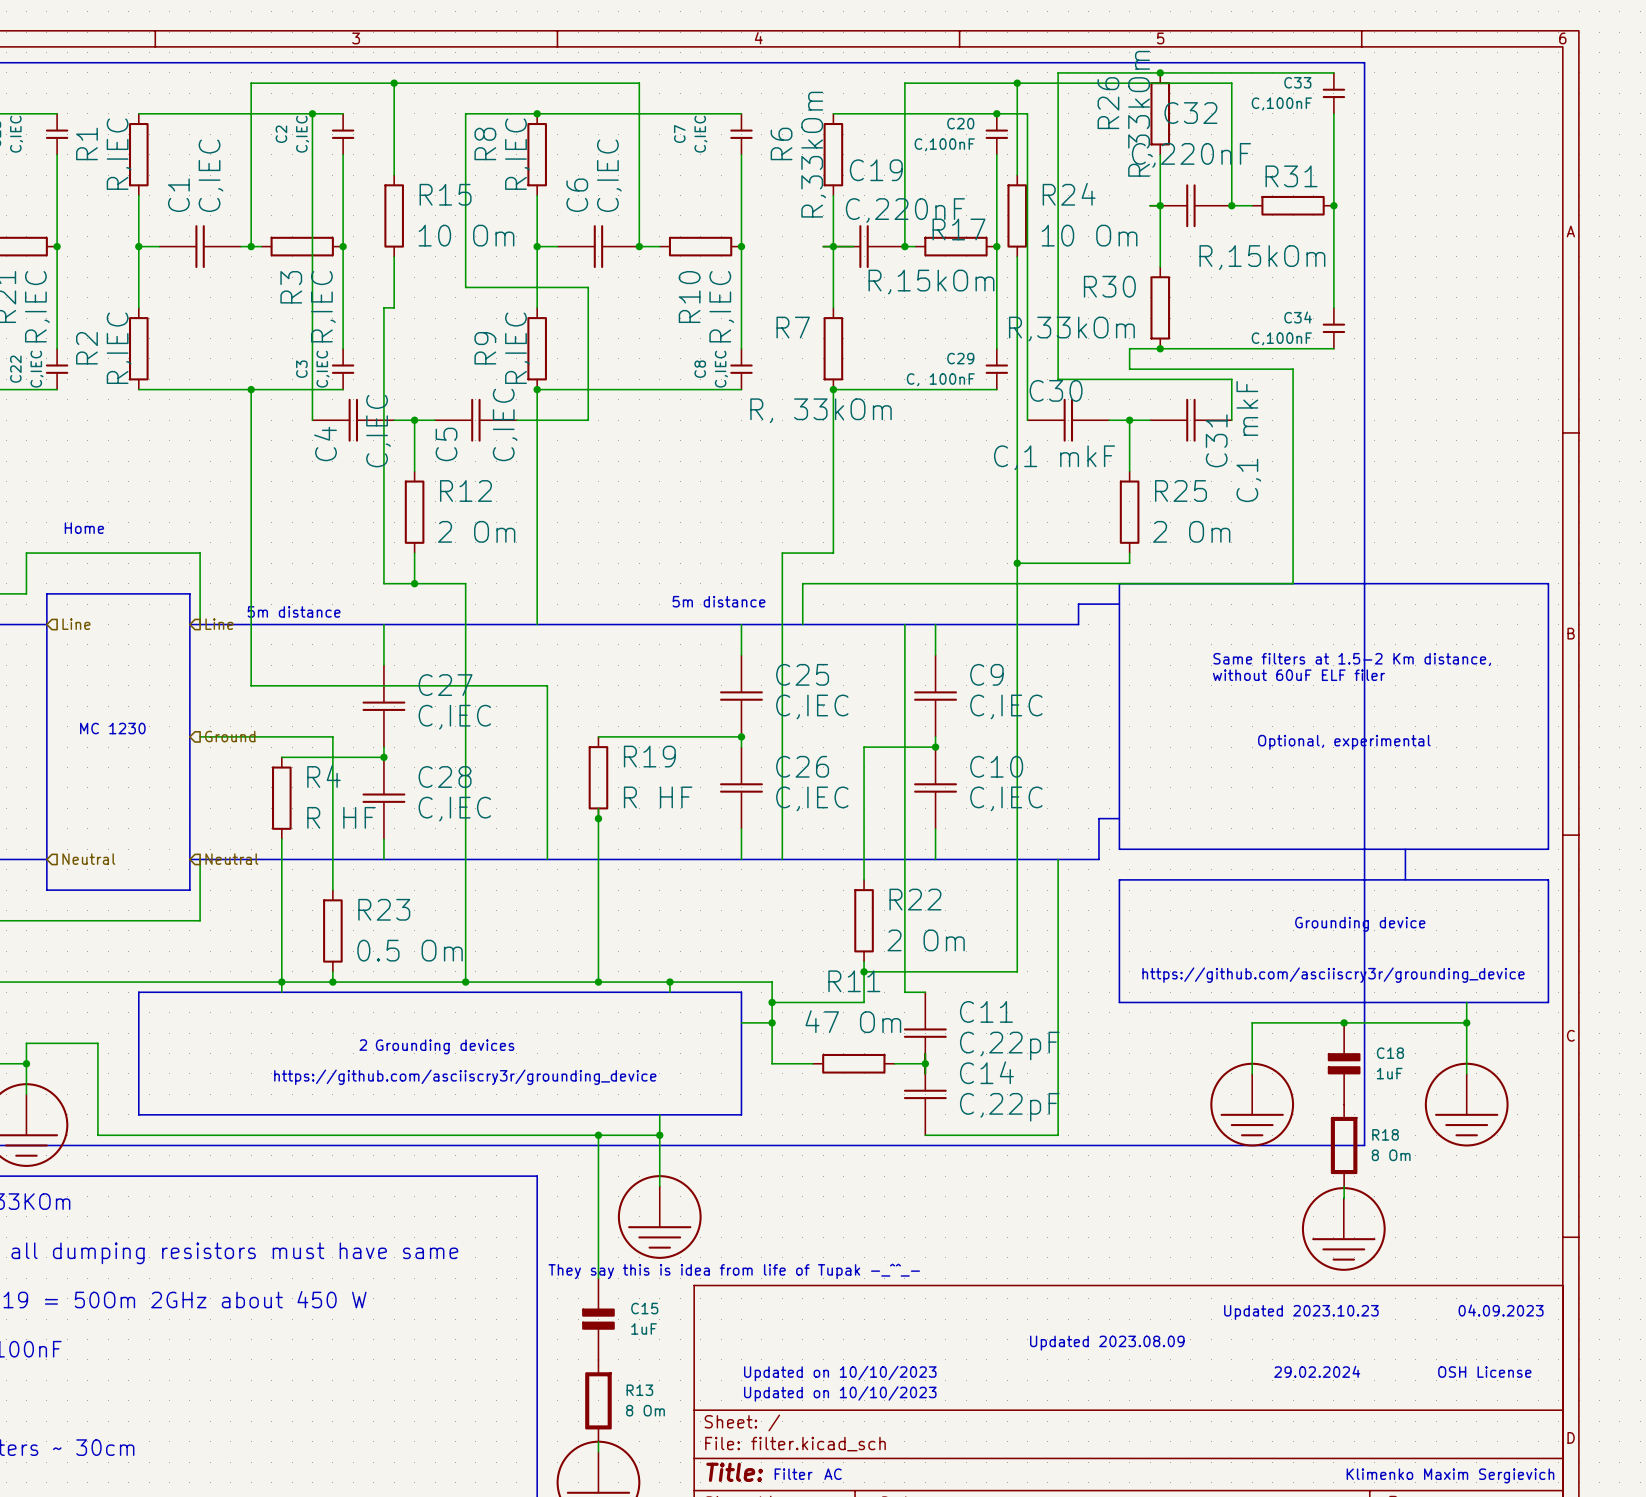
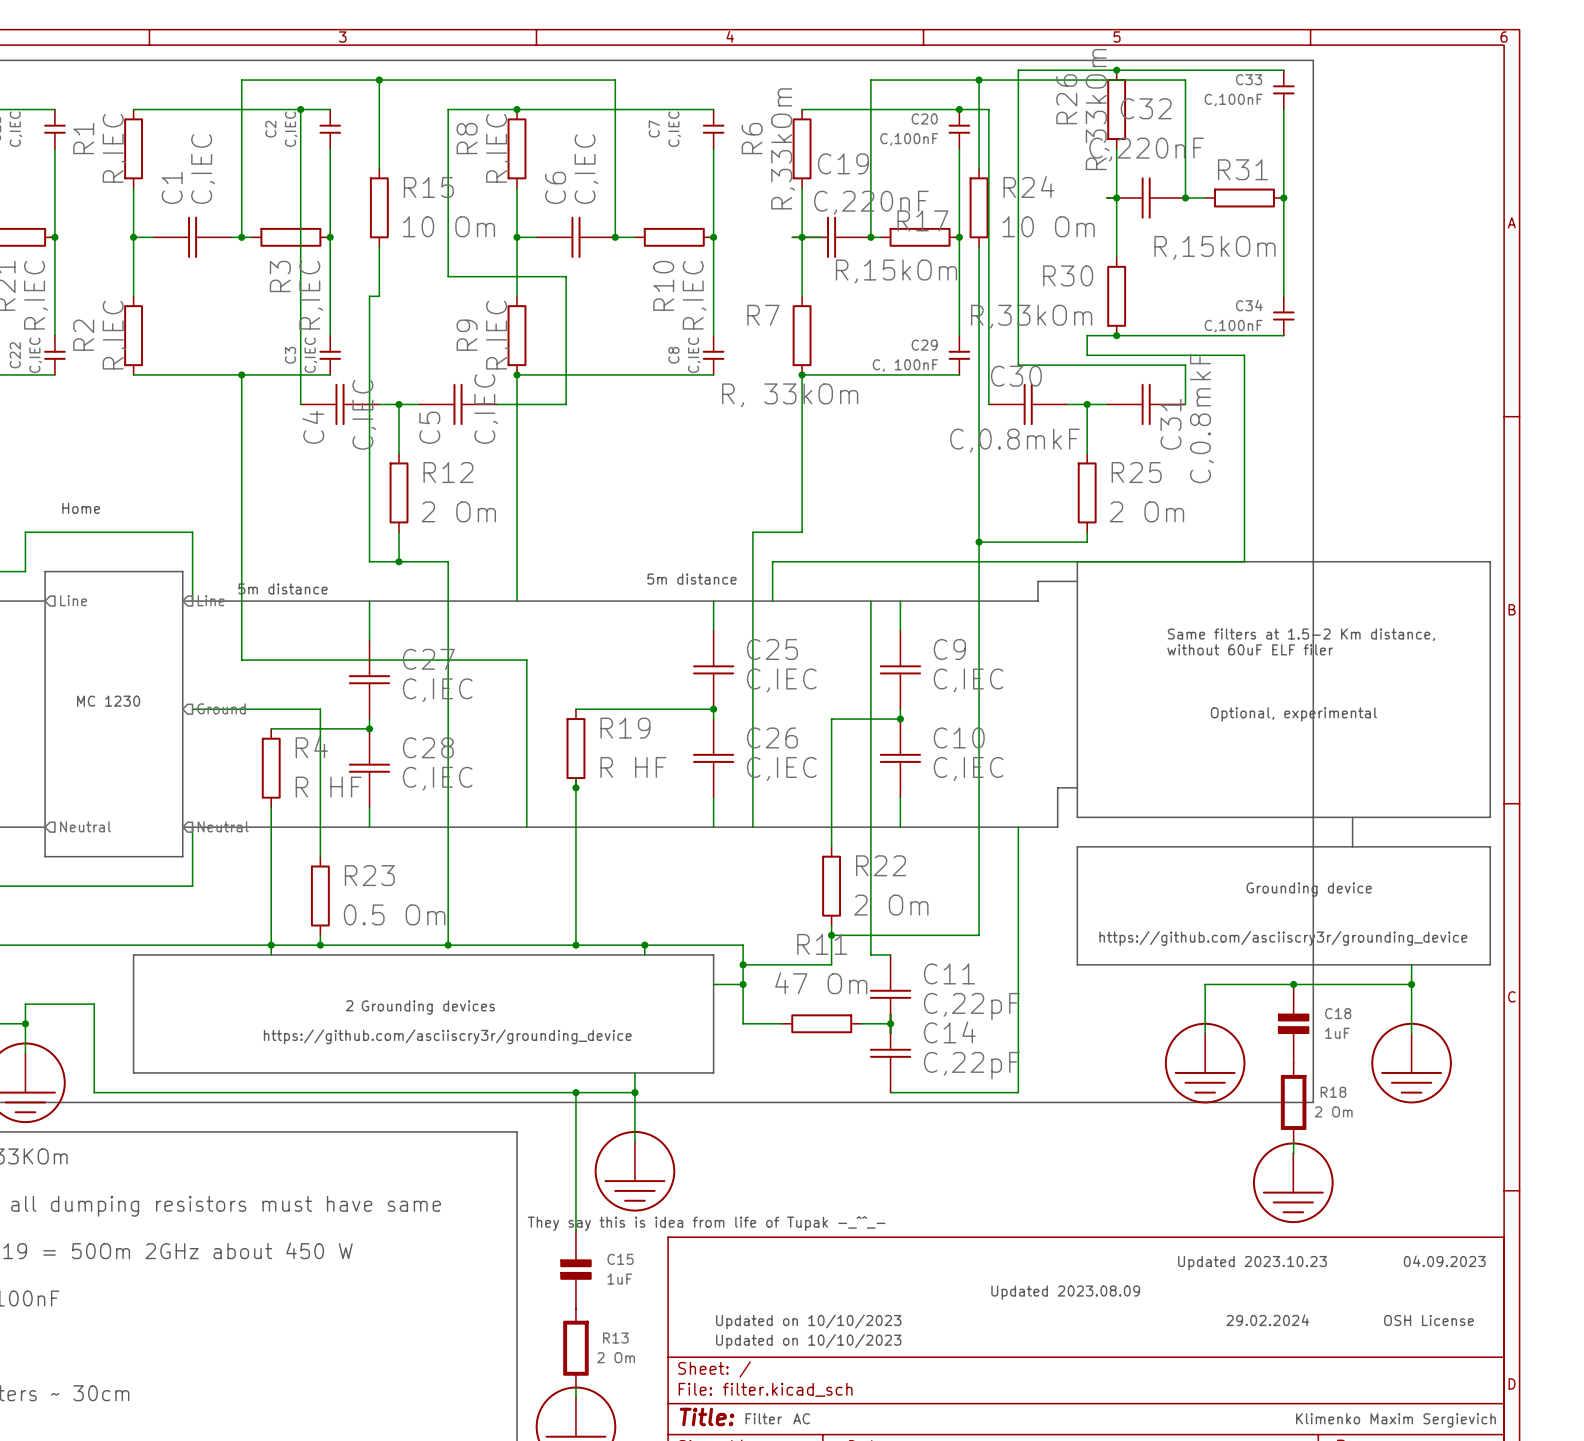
C31 value: C,1 mkF (1248, 441) -> C,0.8mkF (1201, 418)
C30 value: C,1 mkF (1054, 457) -> C,0.8mkF (1014, 440)
R18 value: 8 Om (1391, 1155) -> 2 Om (1333, 1111)
R13 value: 8 Om (645, 1410) -> 2 Om (616, 1357)

